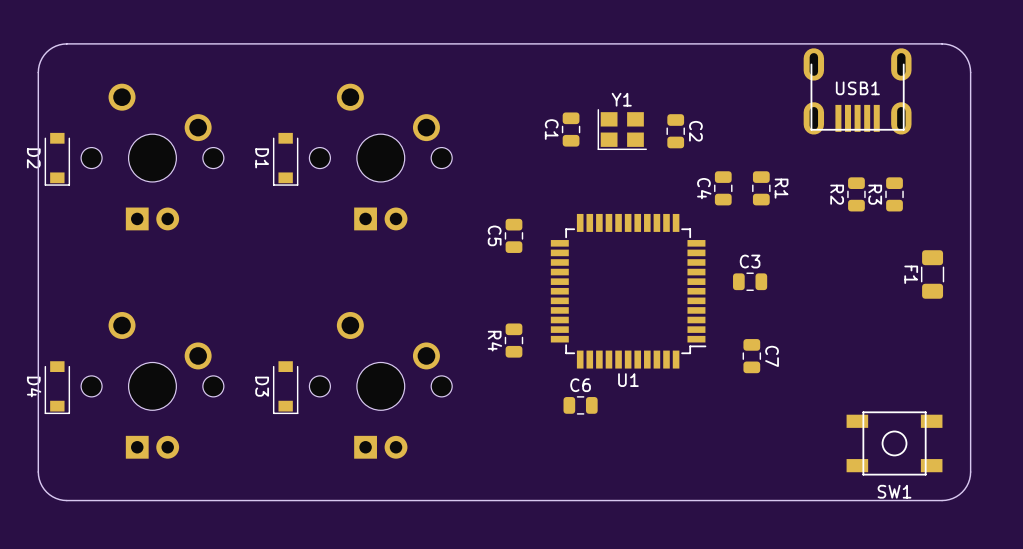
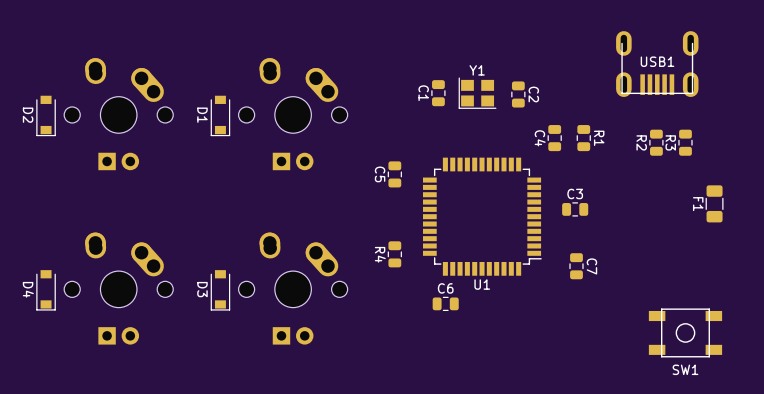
board edge: (942, 43) (66, 43) (55, 46) (42, 58) (38, 72) (38, 472) (40, 482) (52, 496) (66, 500) (942, 500) (953, 498) (966, 486) (970, 472) (970, 72) (968, 61) (962, 52) (953, 46) (942, 43) -> none
part footprint: [81, 83, 224, 231] -> [64, 58, 174, 171]
part footprint: [309, 83, 453, 231] -> [238, 58, 348, 171]
part footprint: [81, 312, 224, 459] -> [64, 232, 174, 345]
part footprint: [309, 312, 453, 459] -> [238, 232, 348, 345]

